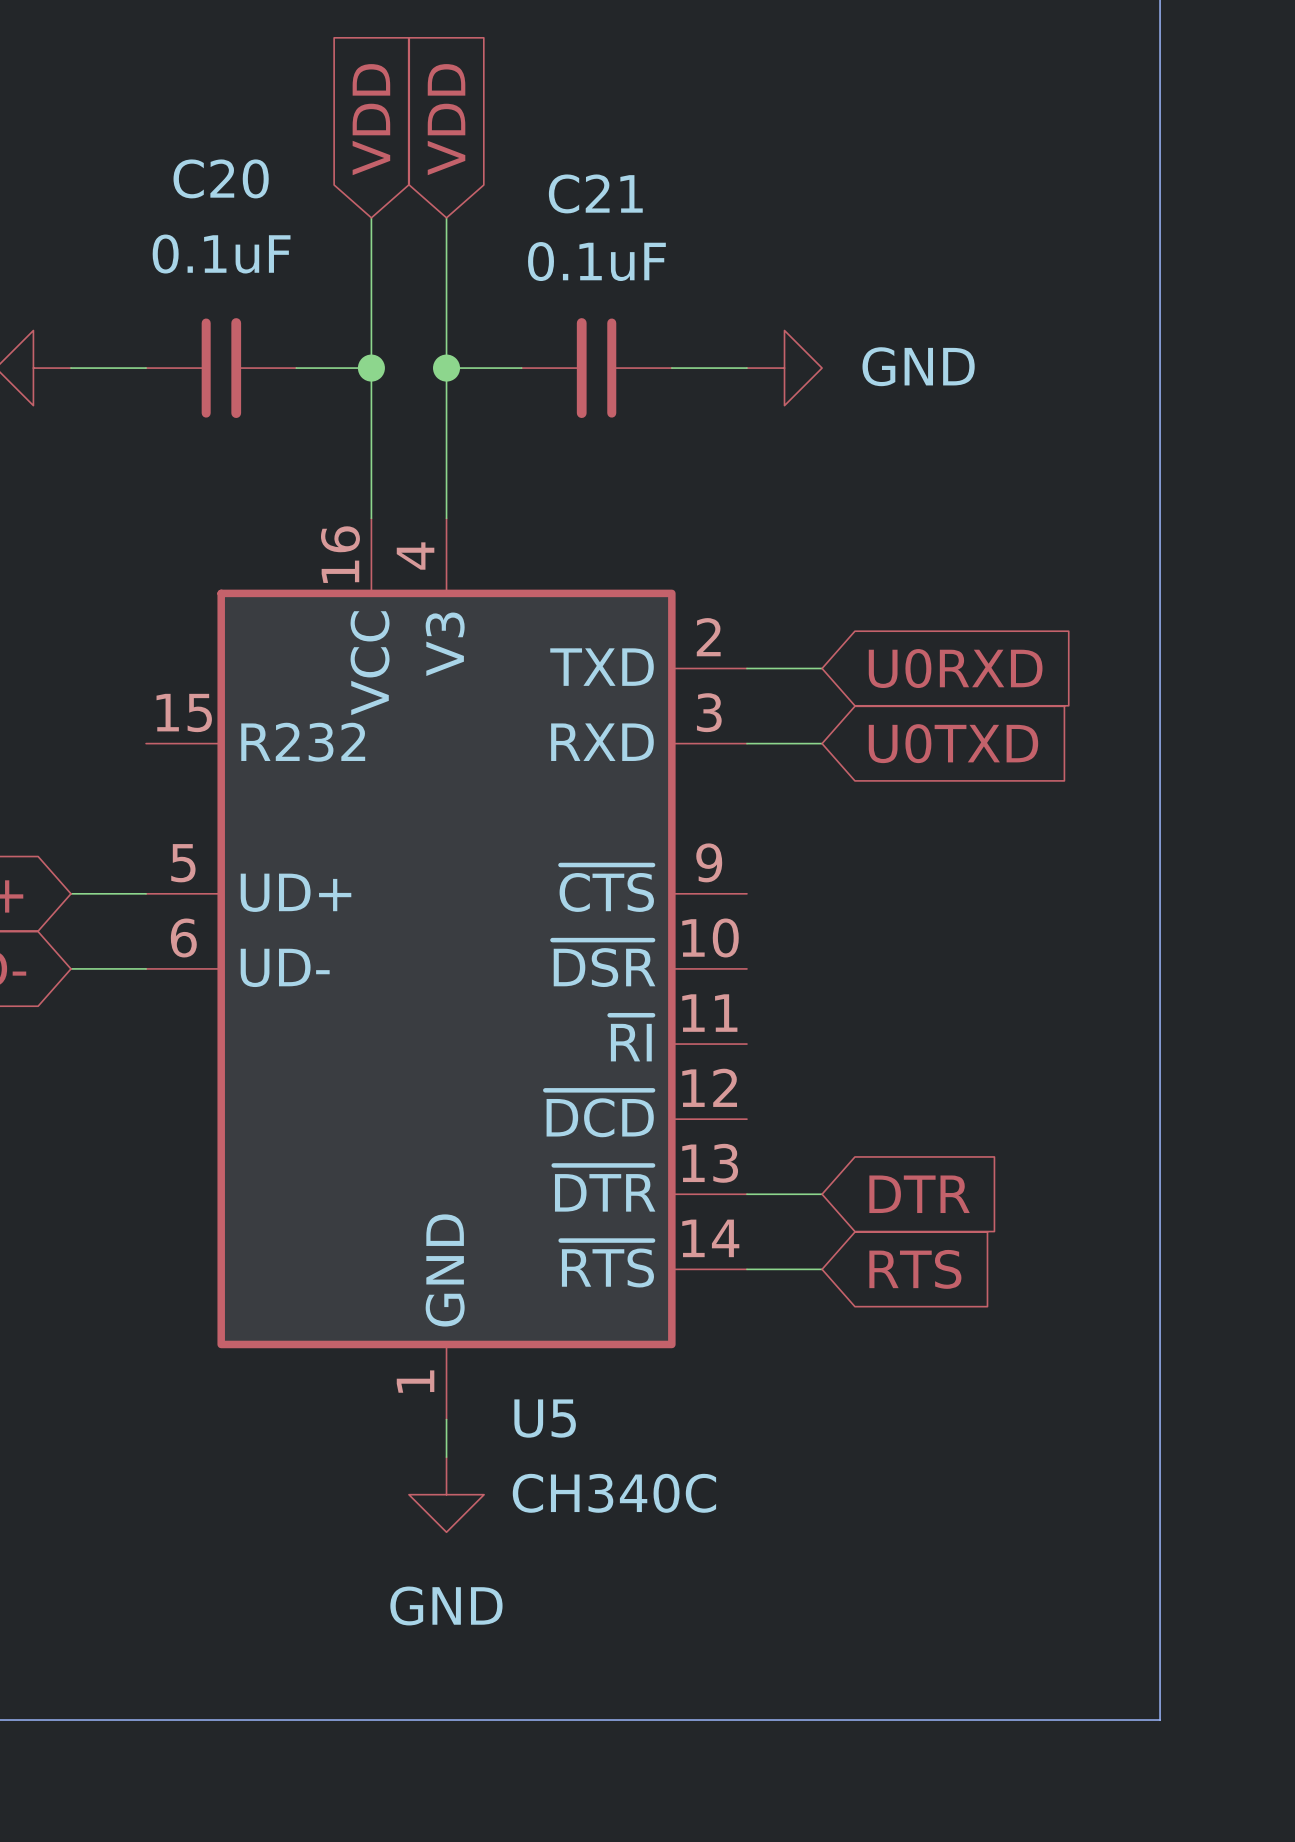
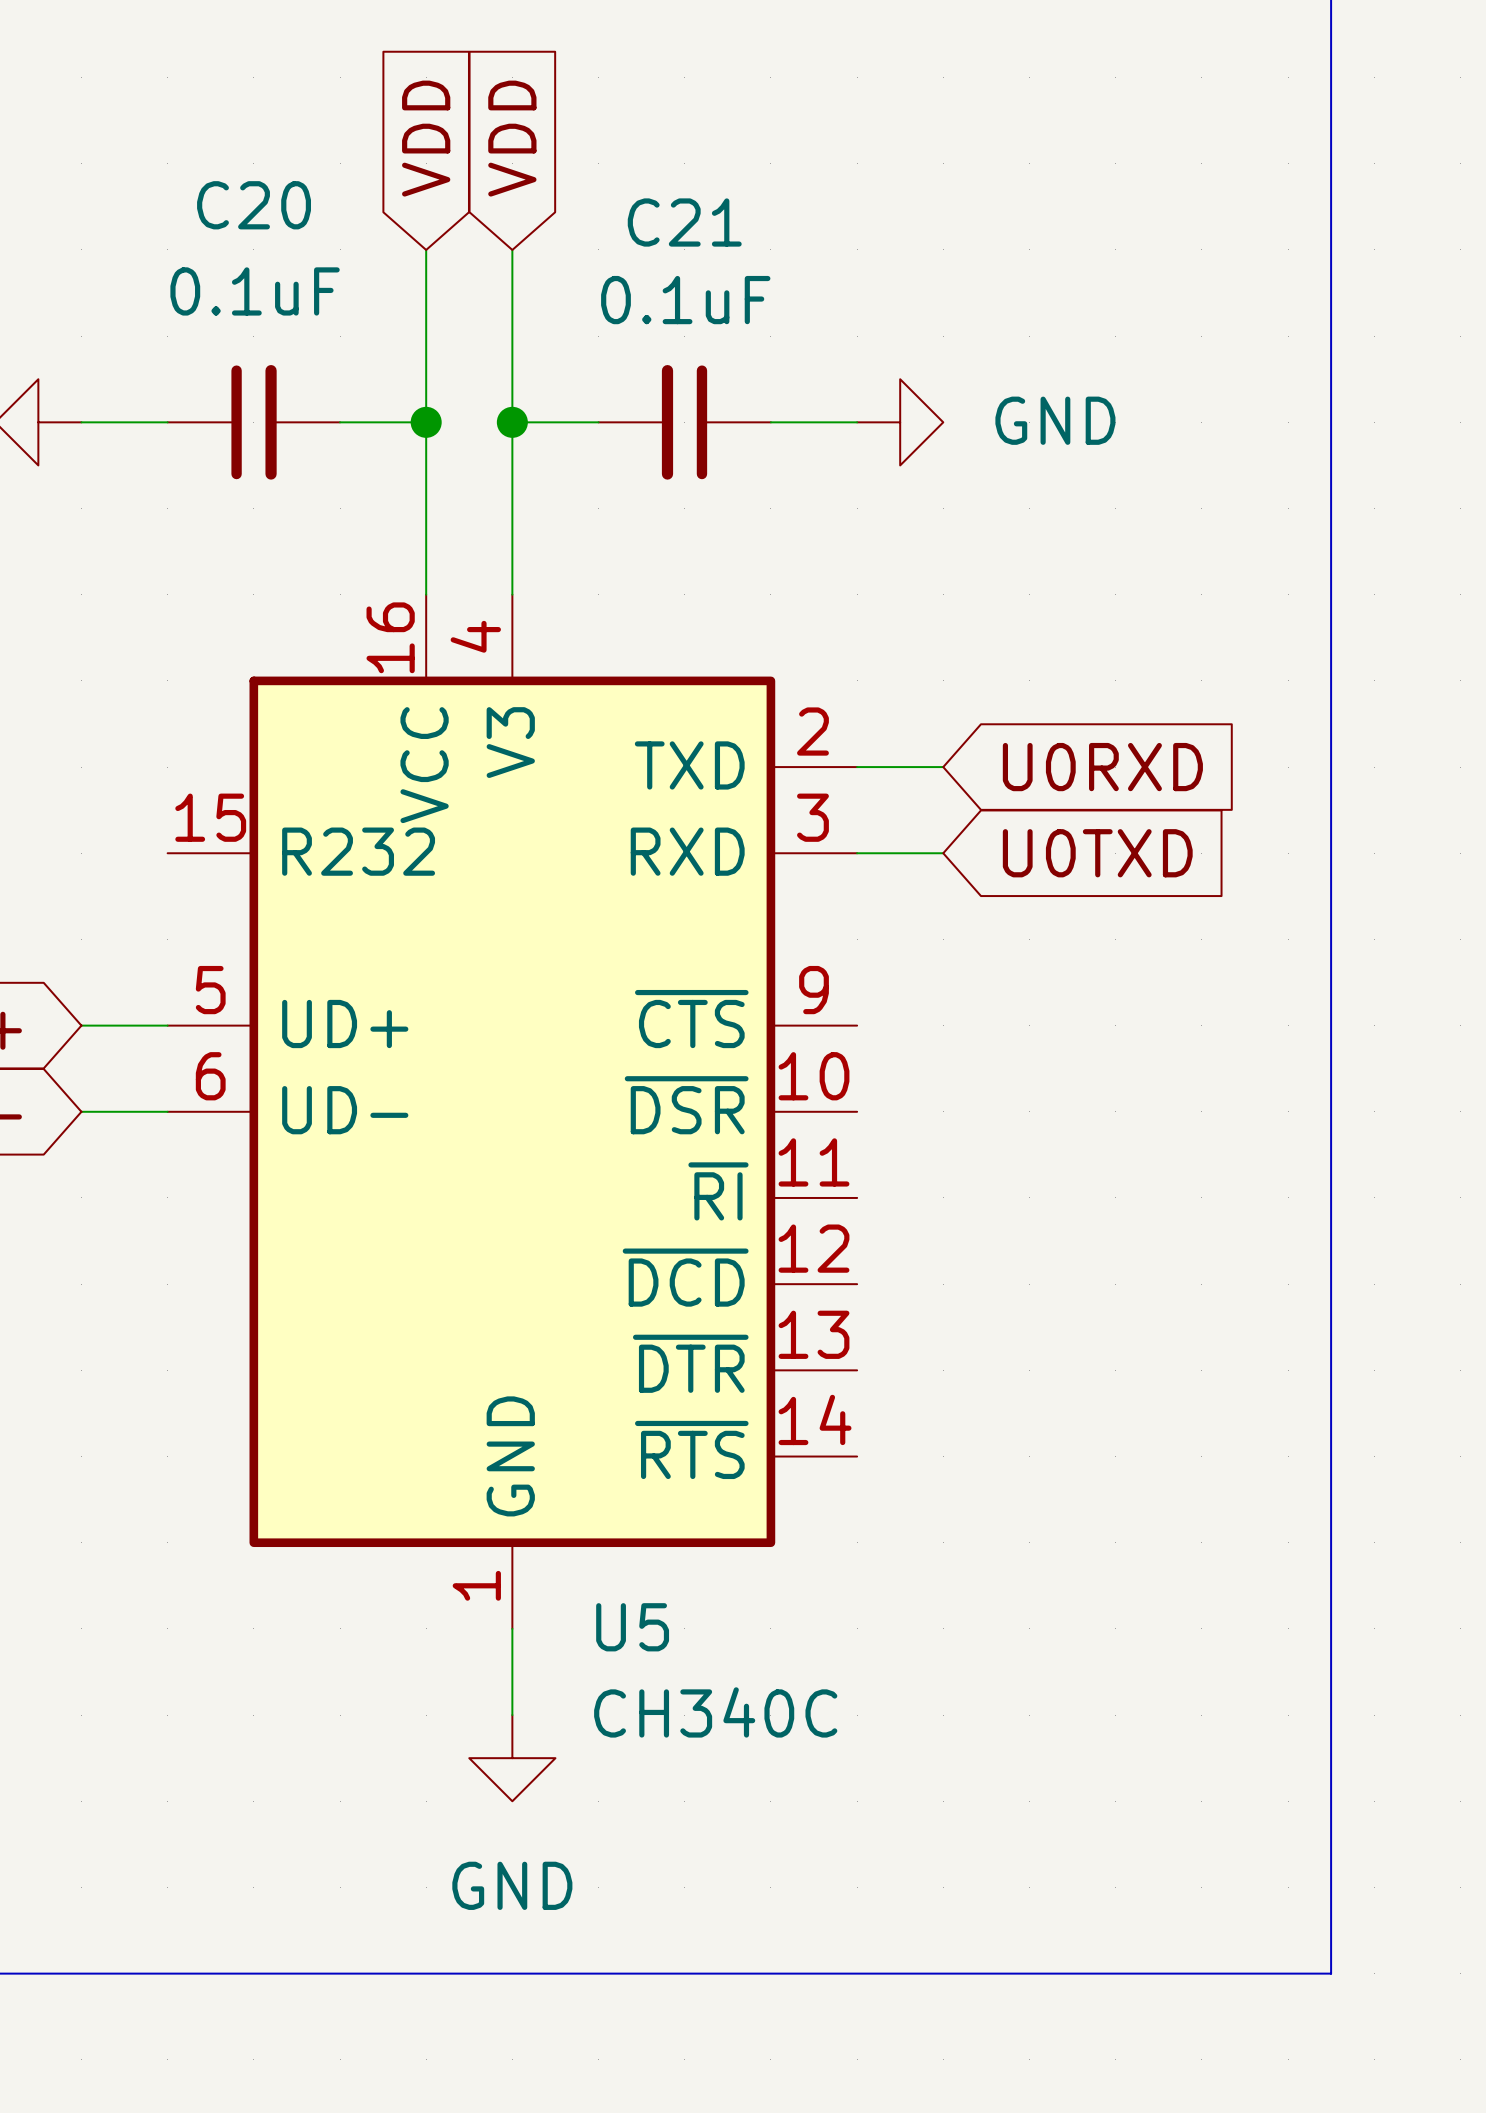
wire: (746, 1194) (822, 1194) -> none
global label: DTR (919, 1194) -> none
wire: (746, 1269) (822, 1269) -> none
global label: RTS (915, 1269) -> none
power symbol position: GND (446, 1494) -> GND (512, 1758)

